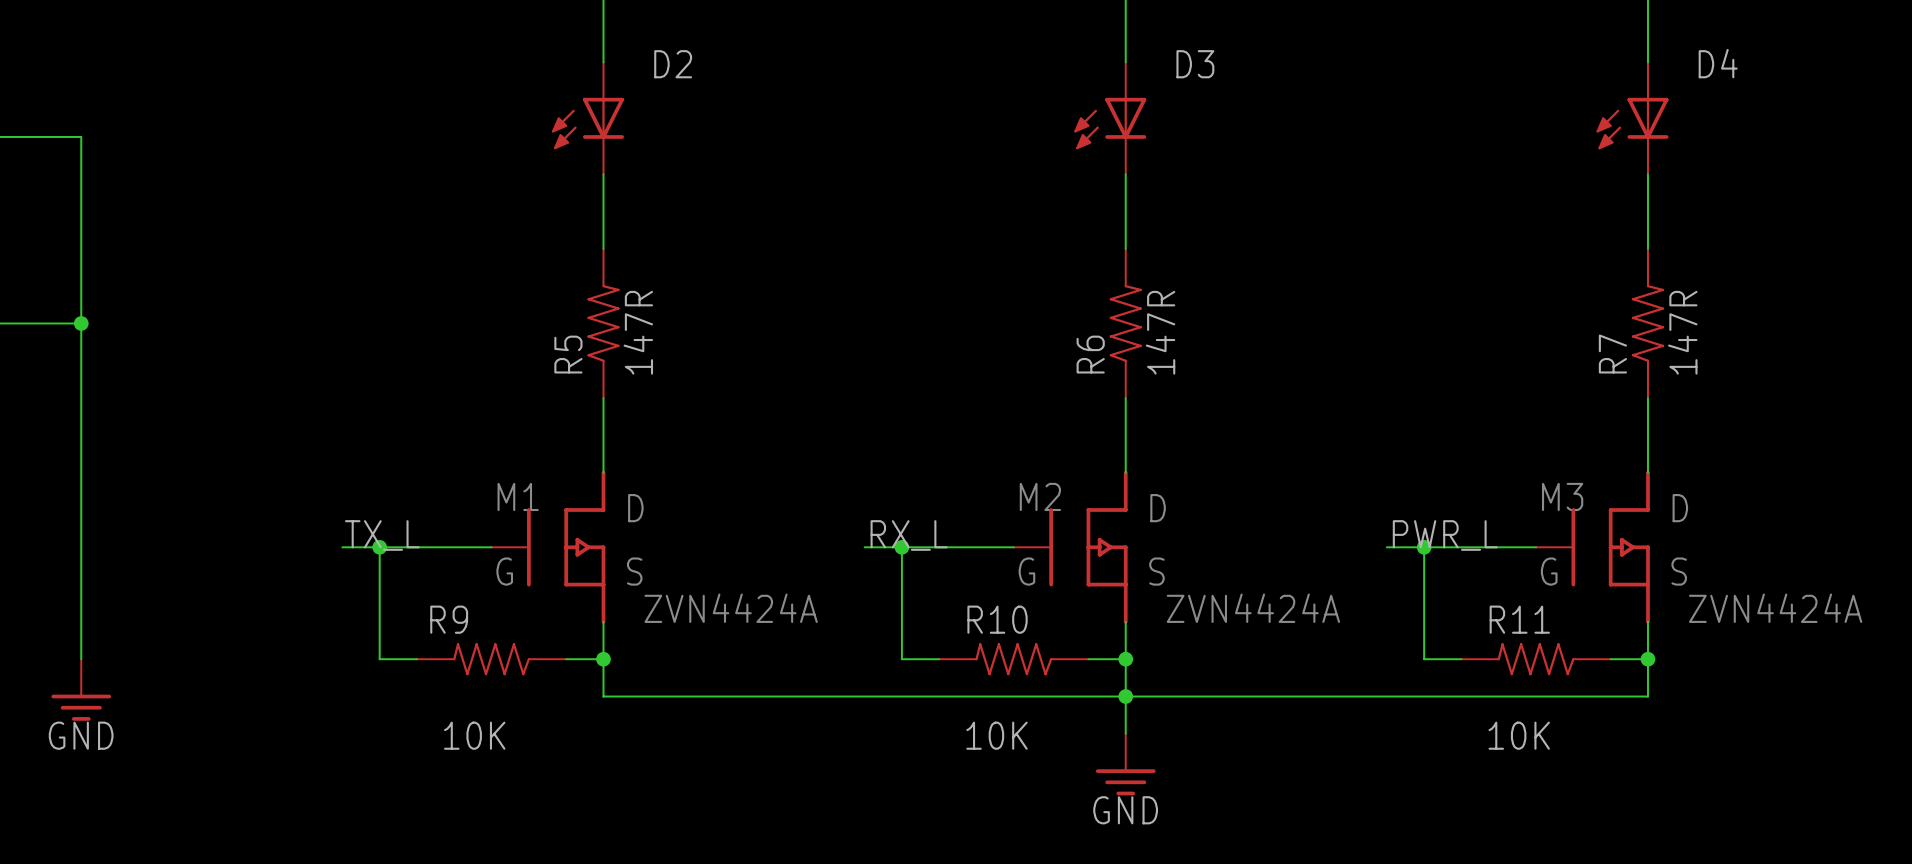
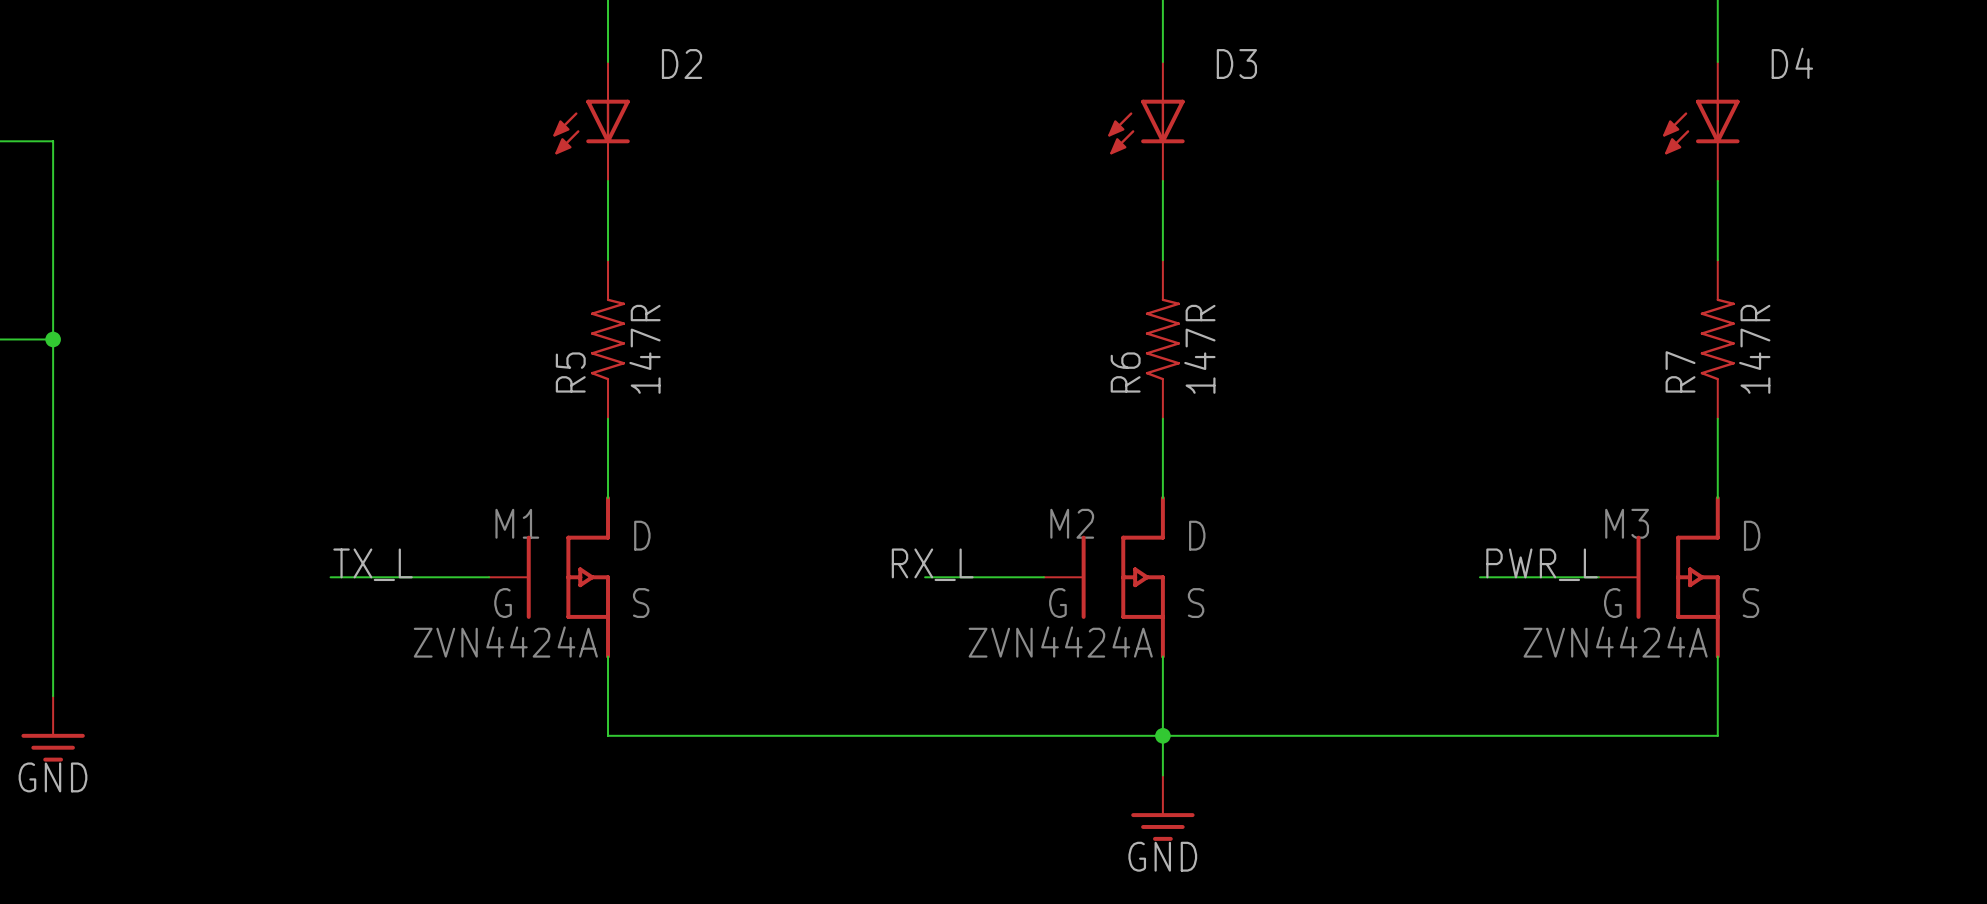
label position: PWR_L (1445, 535) -> PWR_L (1542, 564)
wire: (379, 547) (379, 659) (416, 659) -> none
junction: (379, 547) -> none
wire: (864, 547) (901, 547) (901, 659) (939, 659) -> none
junction: (901, 547) -> none
wire: (1386, 547) (1424, 547) (1424, 659) (1461, 659) -> none
junction: (1424, 547) -> none
M1 value position: ZVN4424A (731, 608) -> ZVN4424A (505, 642)
M2 value position: ZVN4424A (1253, 608) -> ZVN4424A (1060, 642)
M3 value position: ZVN4424A (1775, 608) -> ZVN4424A (1615, 642)
R9: 10K (491, 659) -> none
wire: (566, 659) (603, 659) -> none
junction: (603, 659) -> none
R10: 10K (1013, 659) -> none
wire: (1088, 659) (1125, 659) -> none
junction: (1125, 659) -> none
R11: 10K (1536, 659) -> none
wire: (1610, 659) (1647, 659) -> none
junction: (1647, 659) -> none

